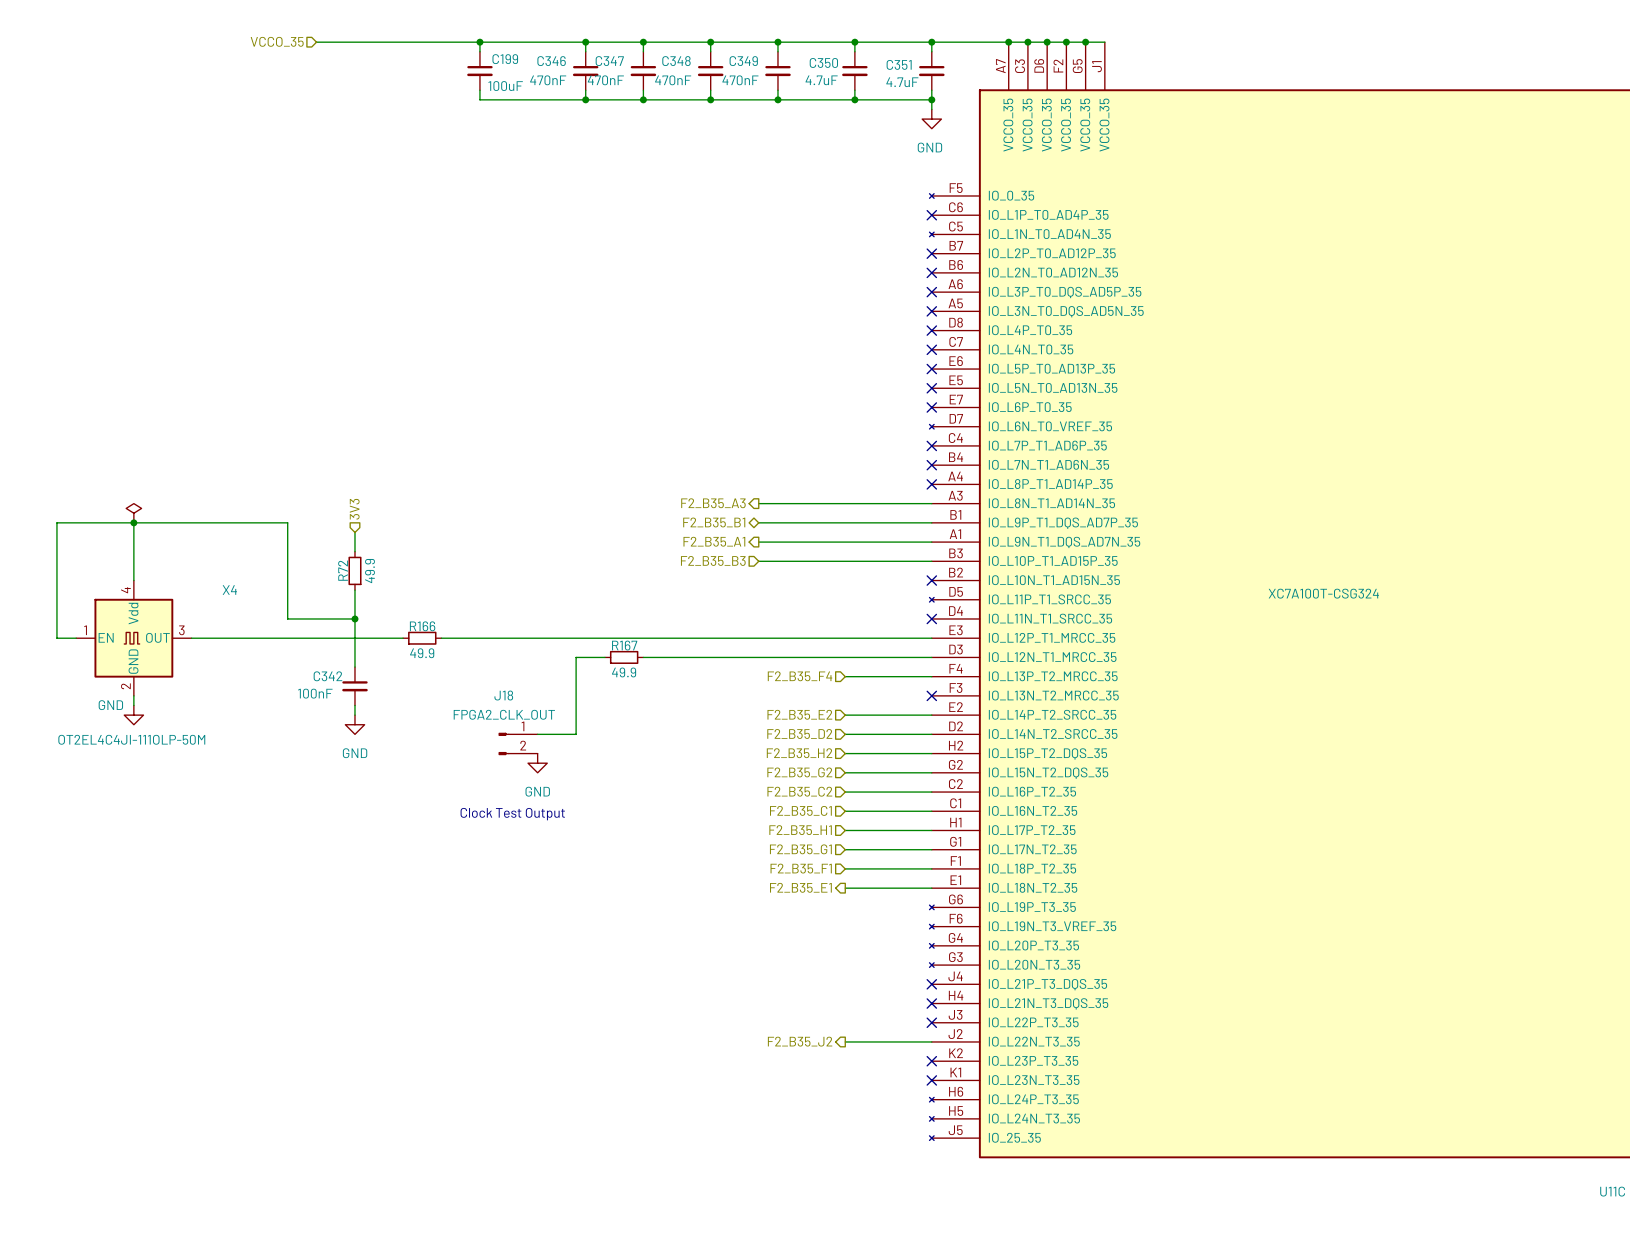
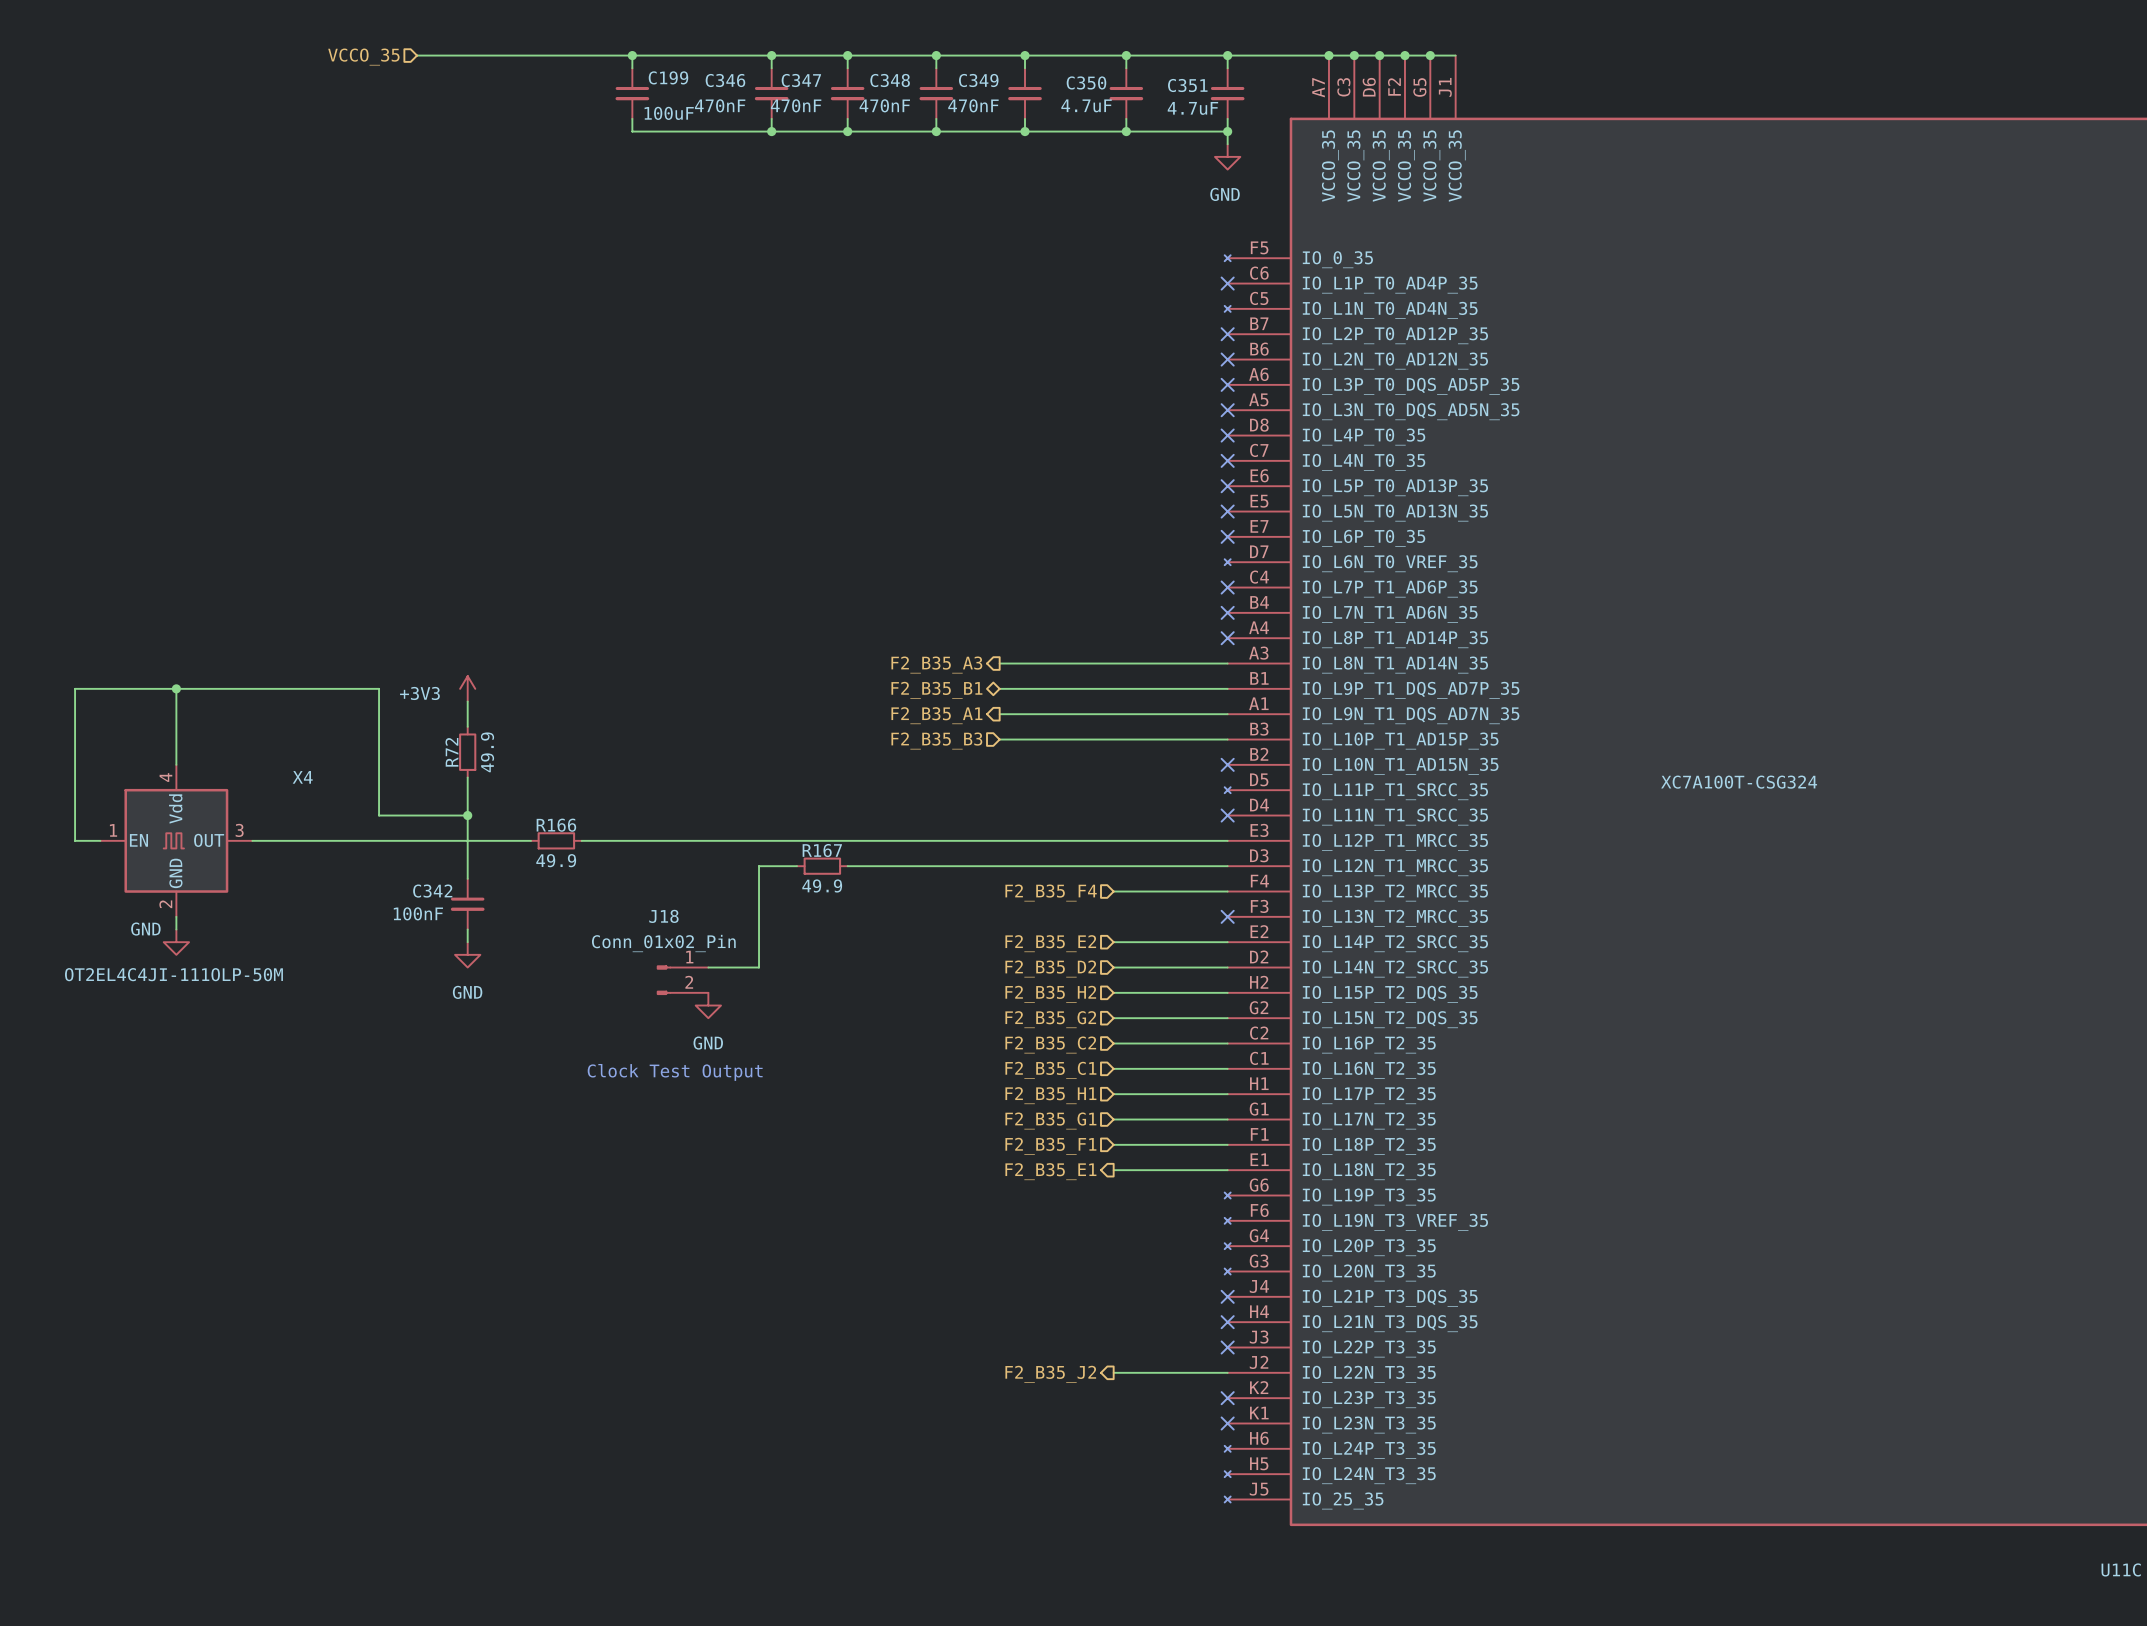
hierarchical label: 3V3 (354, 509) -> none
power symbol: (133, 513) -> none
power symbol: none -> +3V3 (467, 688)
J18 value: FPGA2_CLK_OUT (504, 714) -> Conn_01x02_Pin (663, 943)

